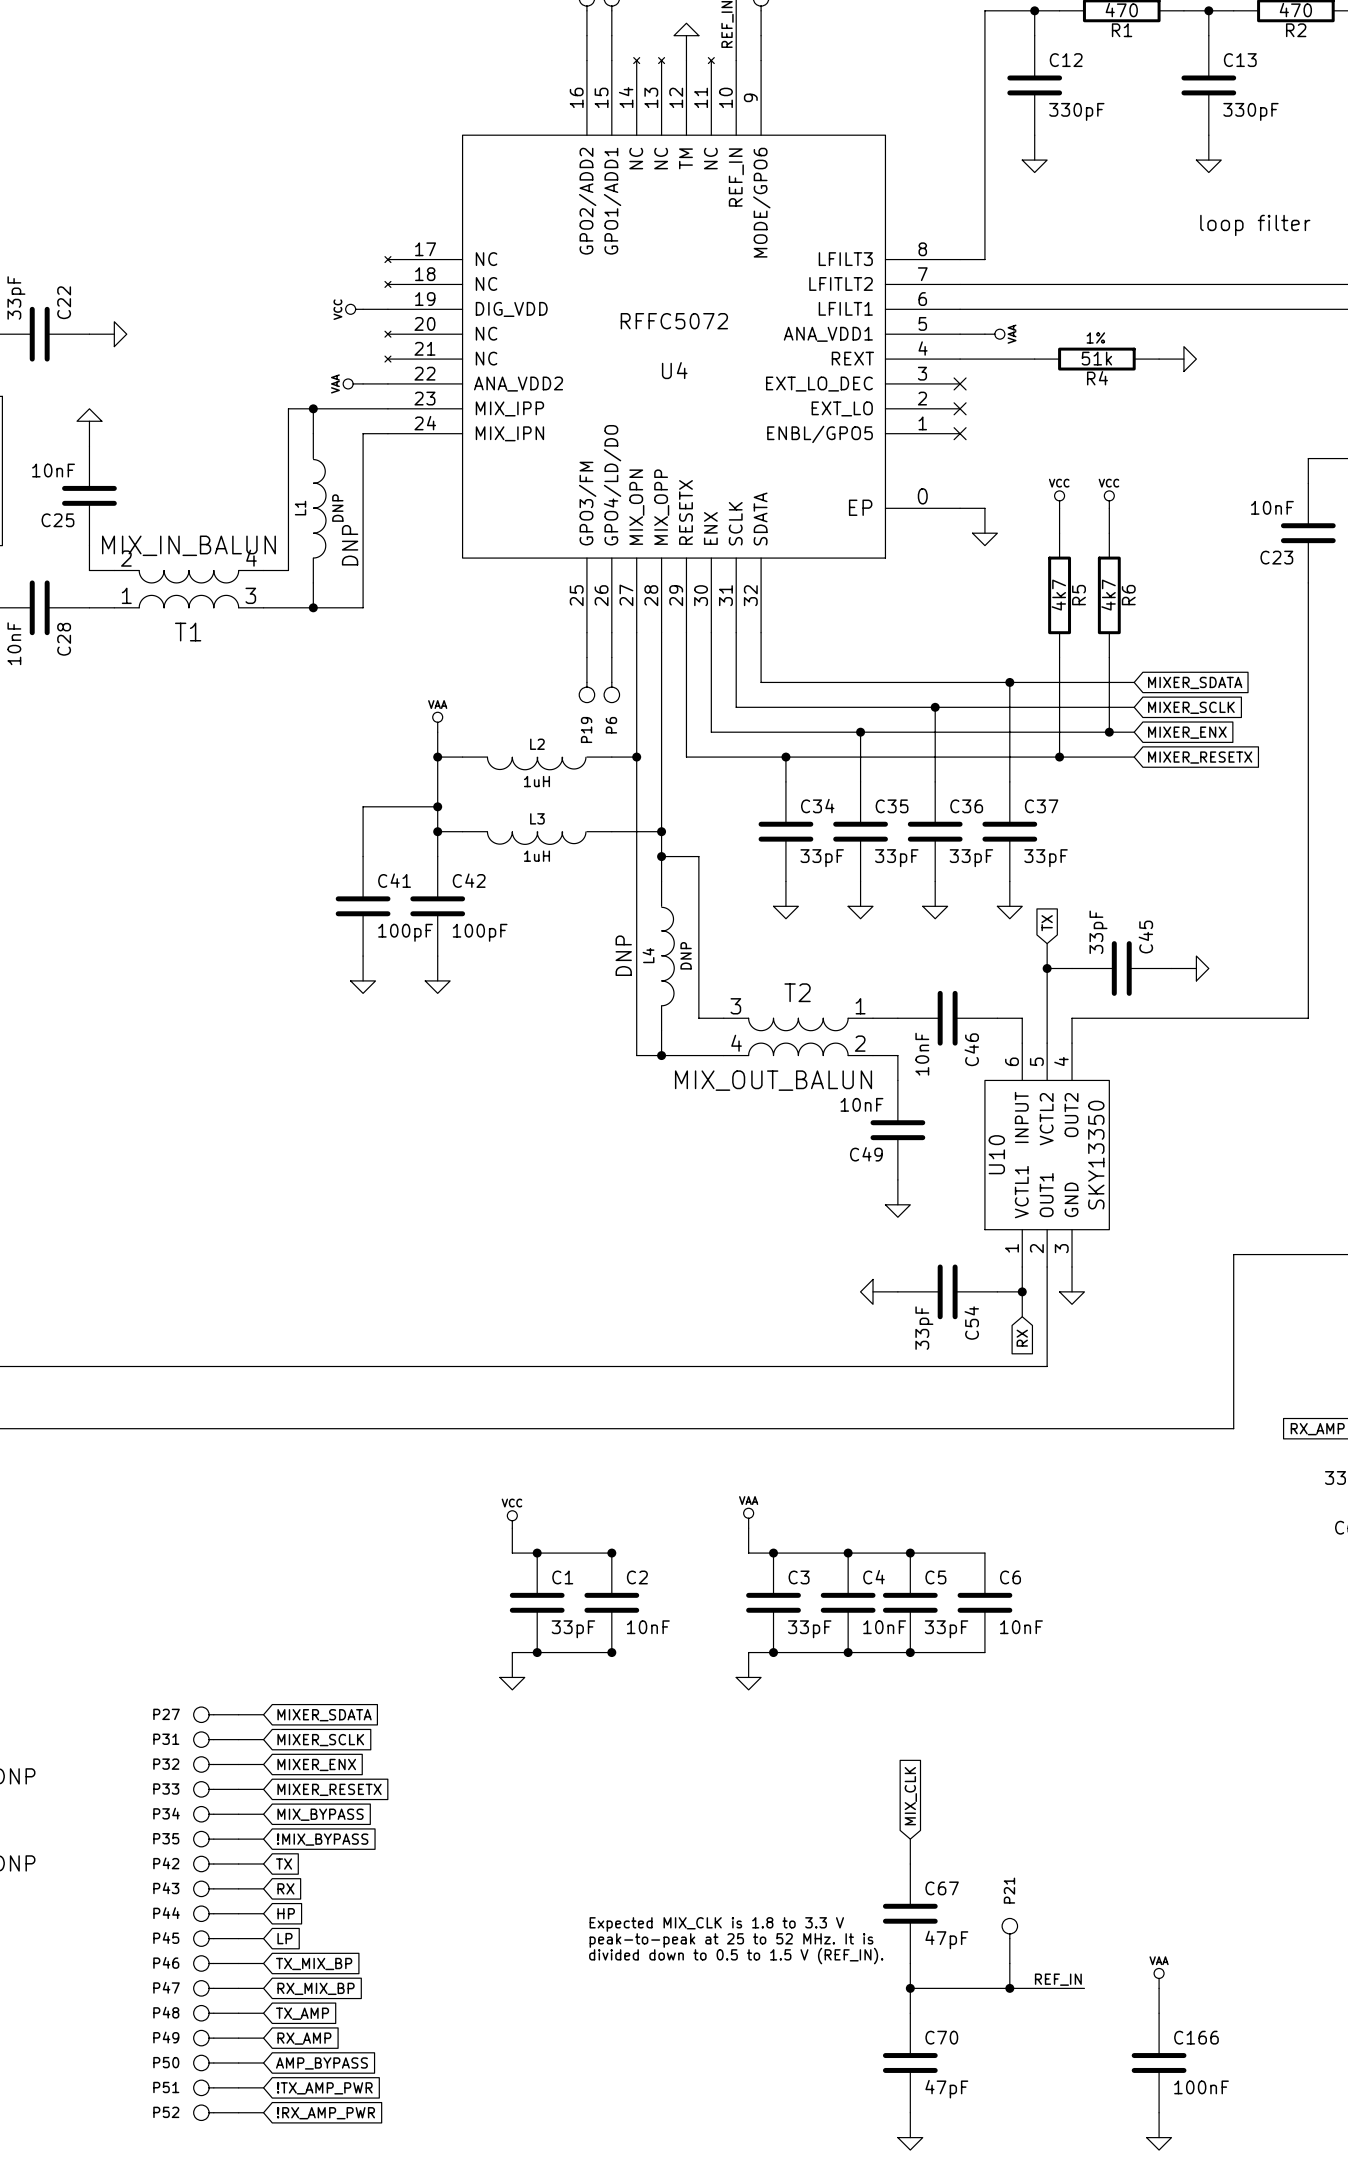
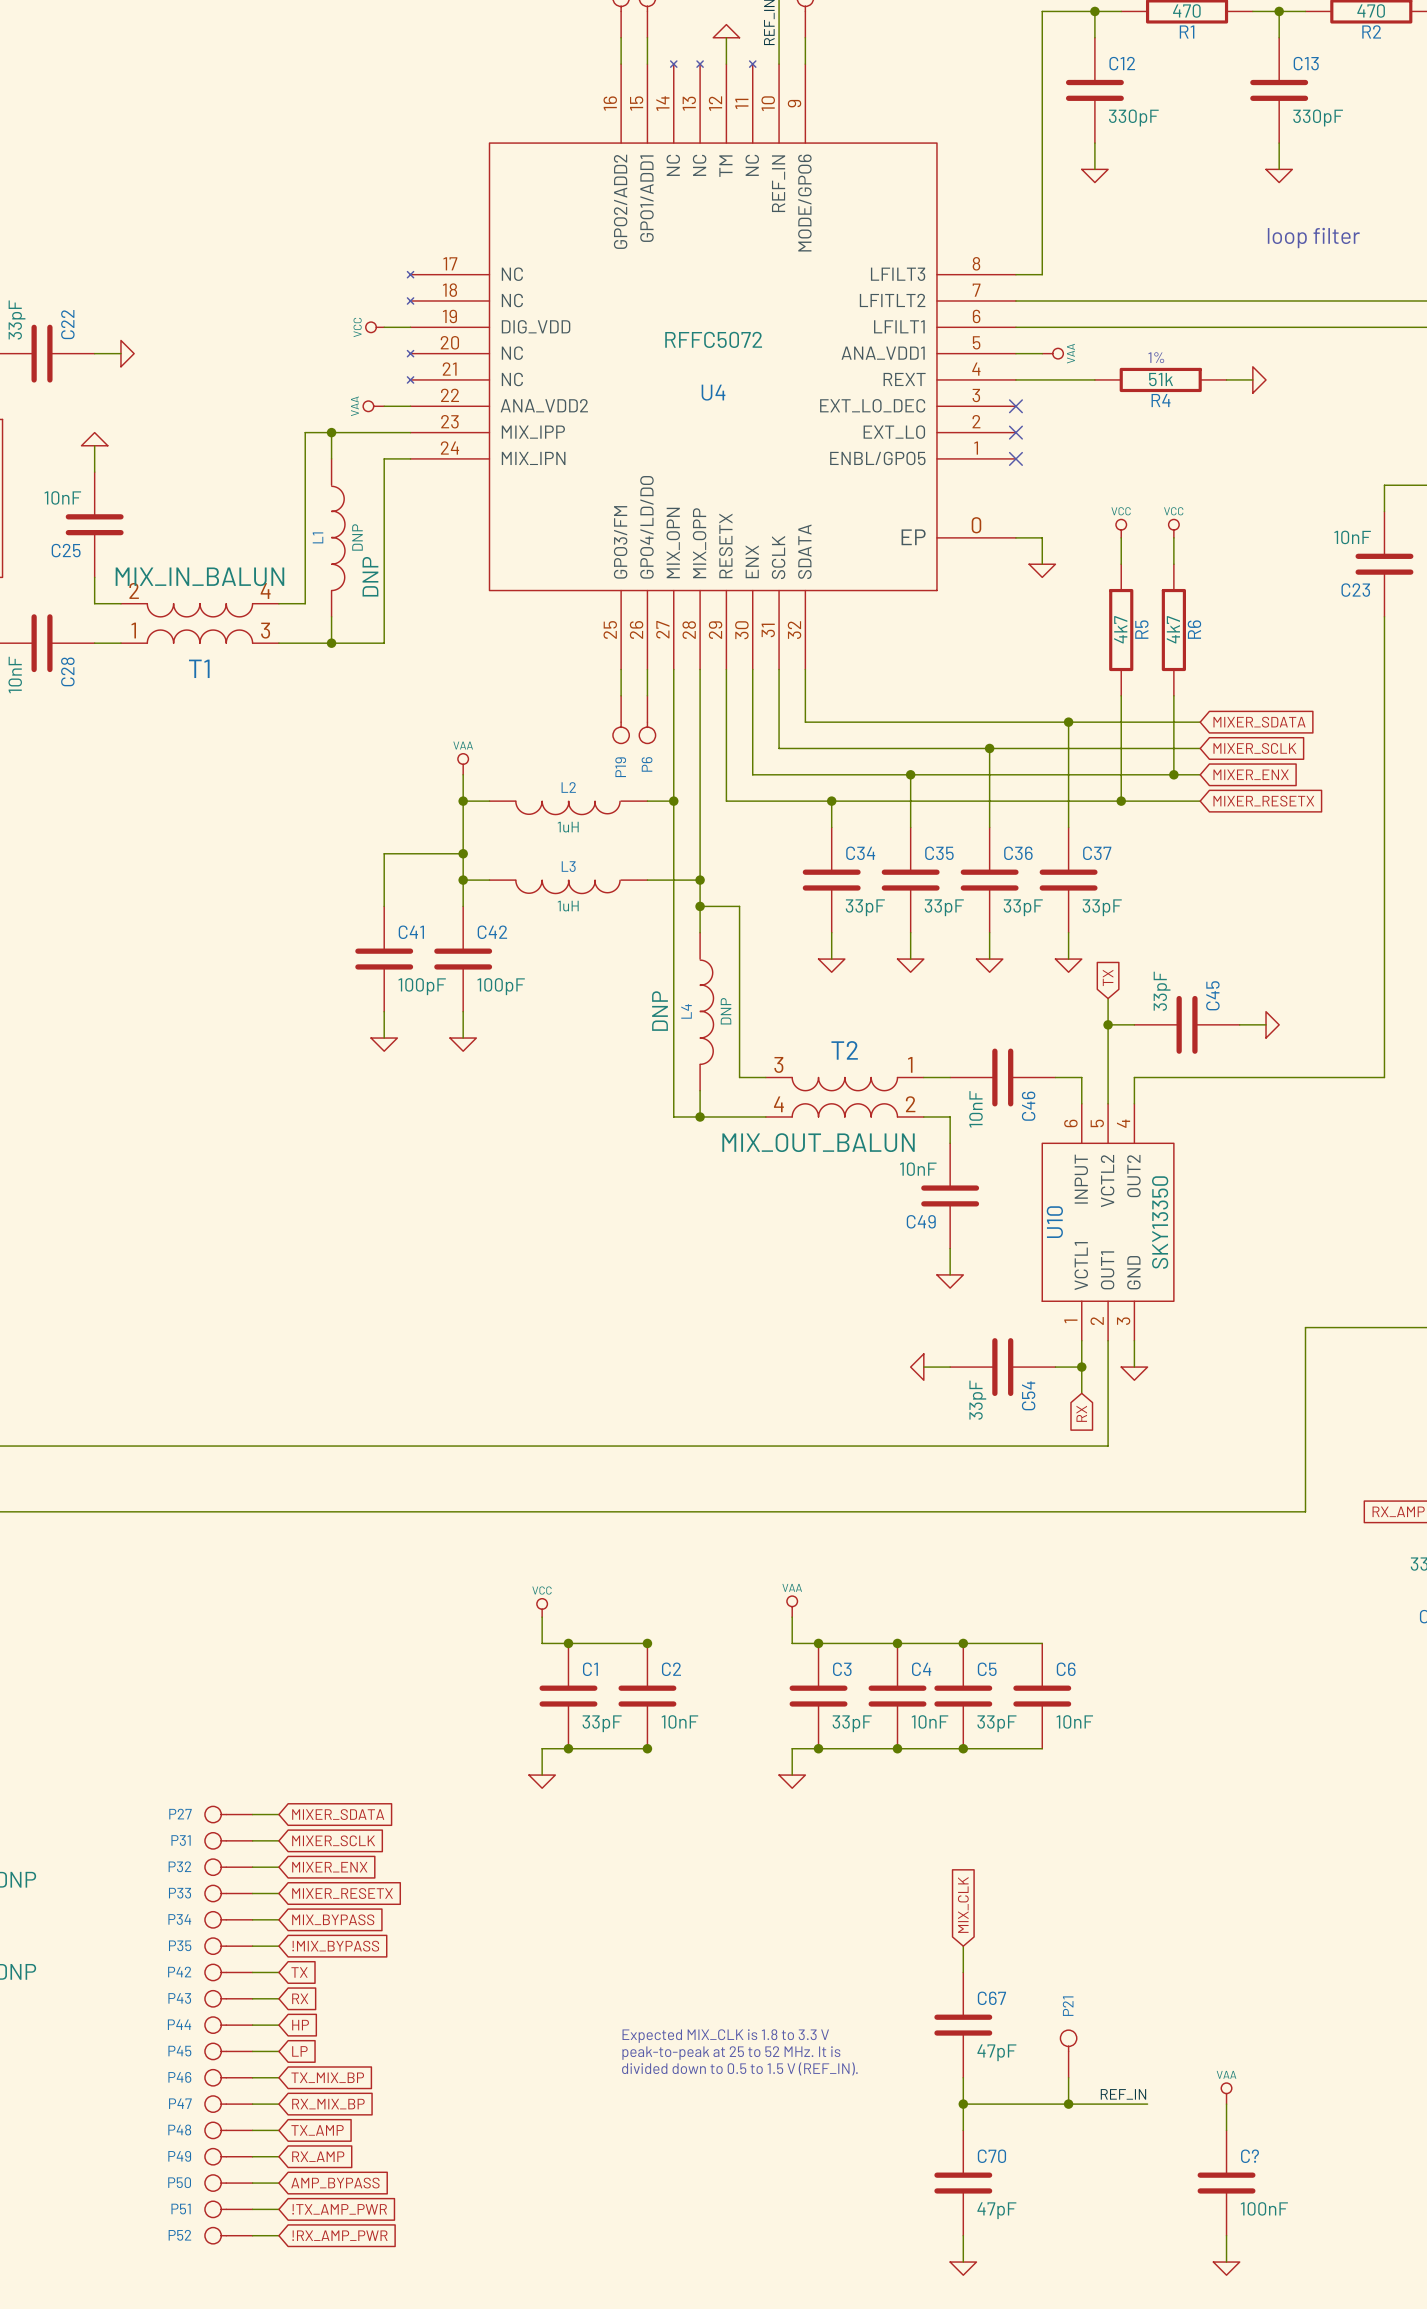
C166 name: C166 (1196, 2037) -> C? (1250, 2156)

